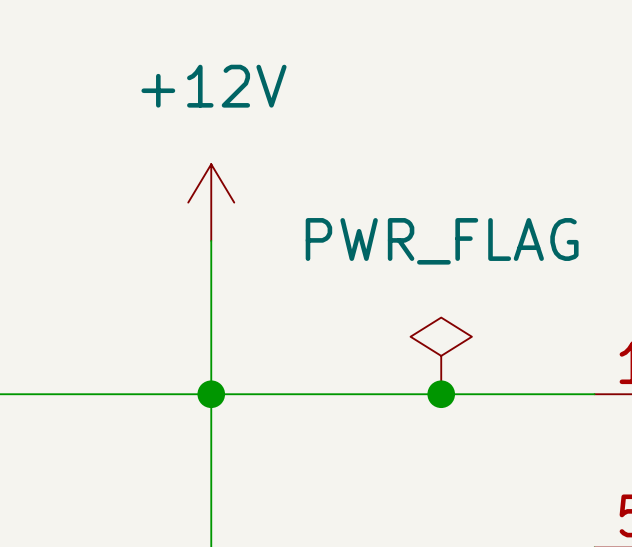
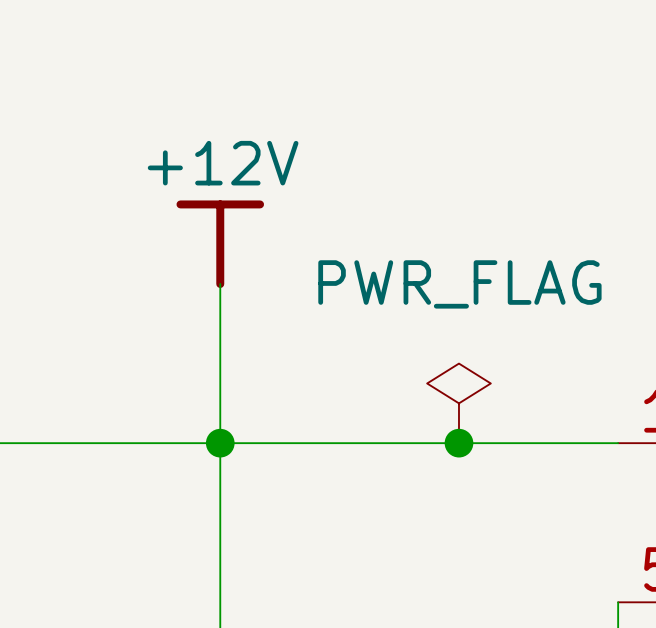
power symbol shape: [188, 164, 235, 241] -> [176, 200, 265, 288]

